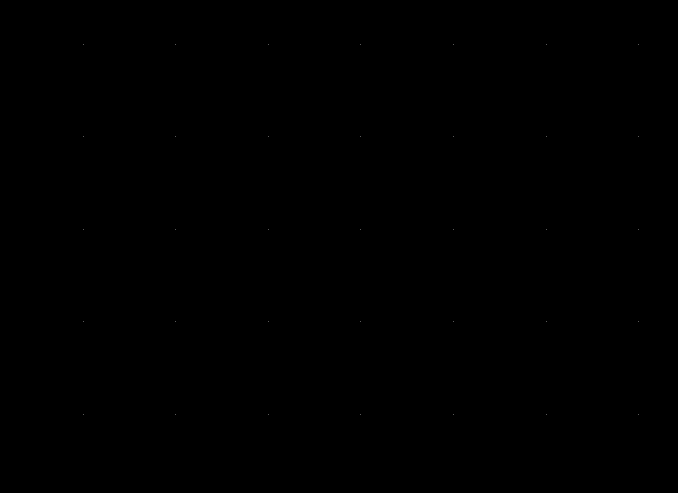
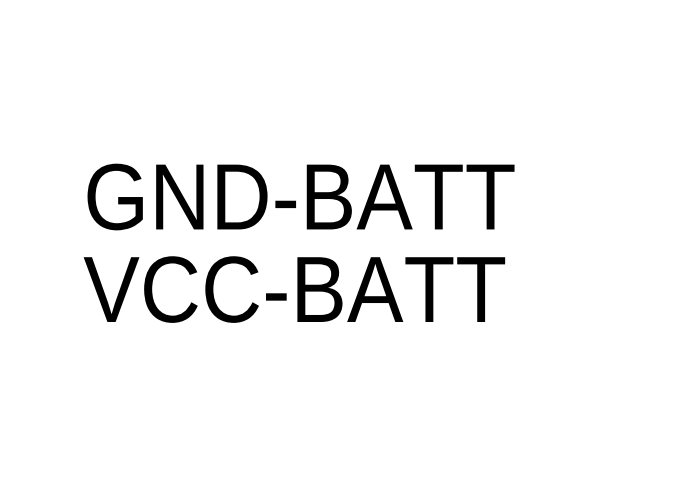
label: none -> GND-BATT (301, 197)
label: none -> VCC-BATT (294, 289)

